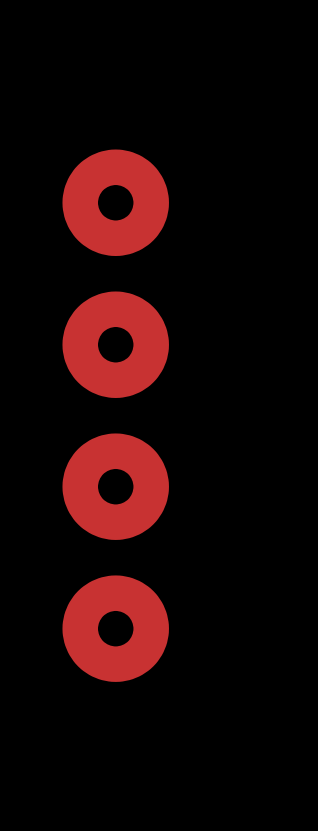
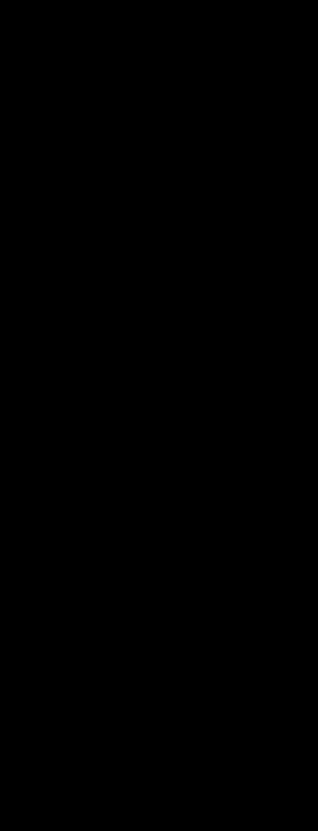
part: (115, 202) -> none
part: (115, 344) -> none
part: (115, 486) -> none
part: (115, 628) -> none

